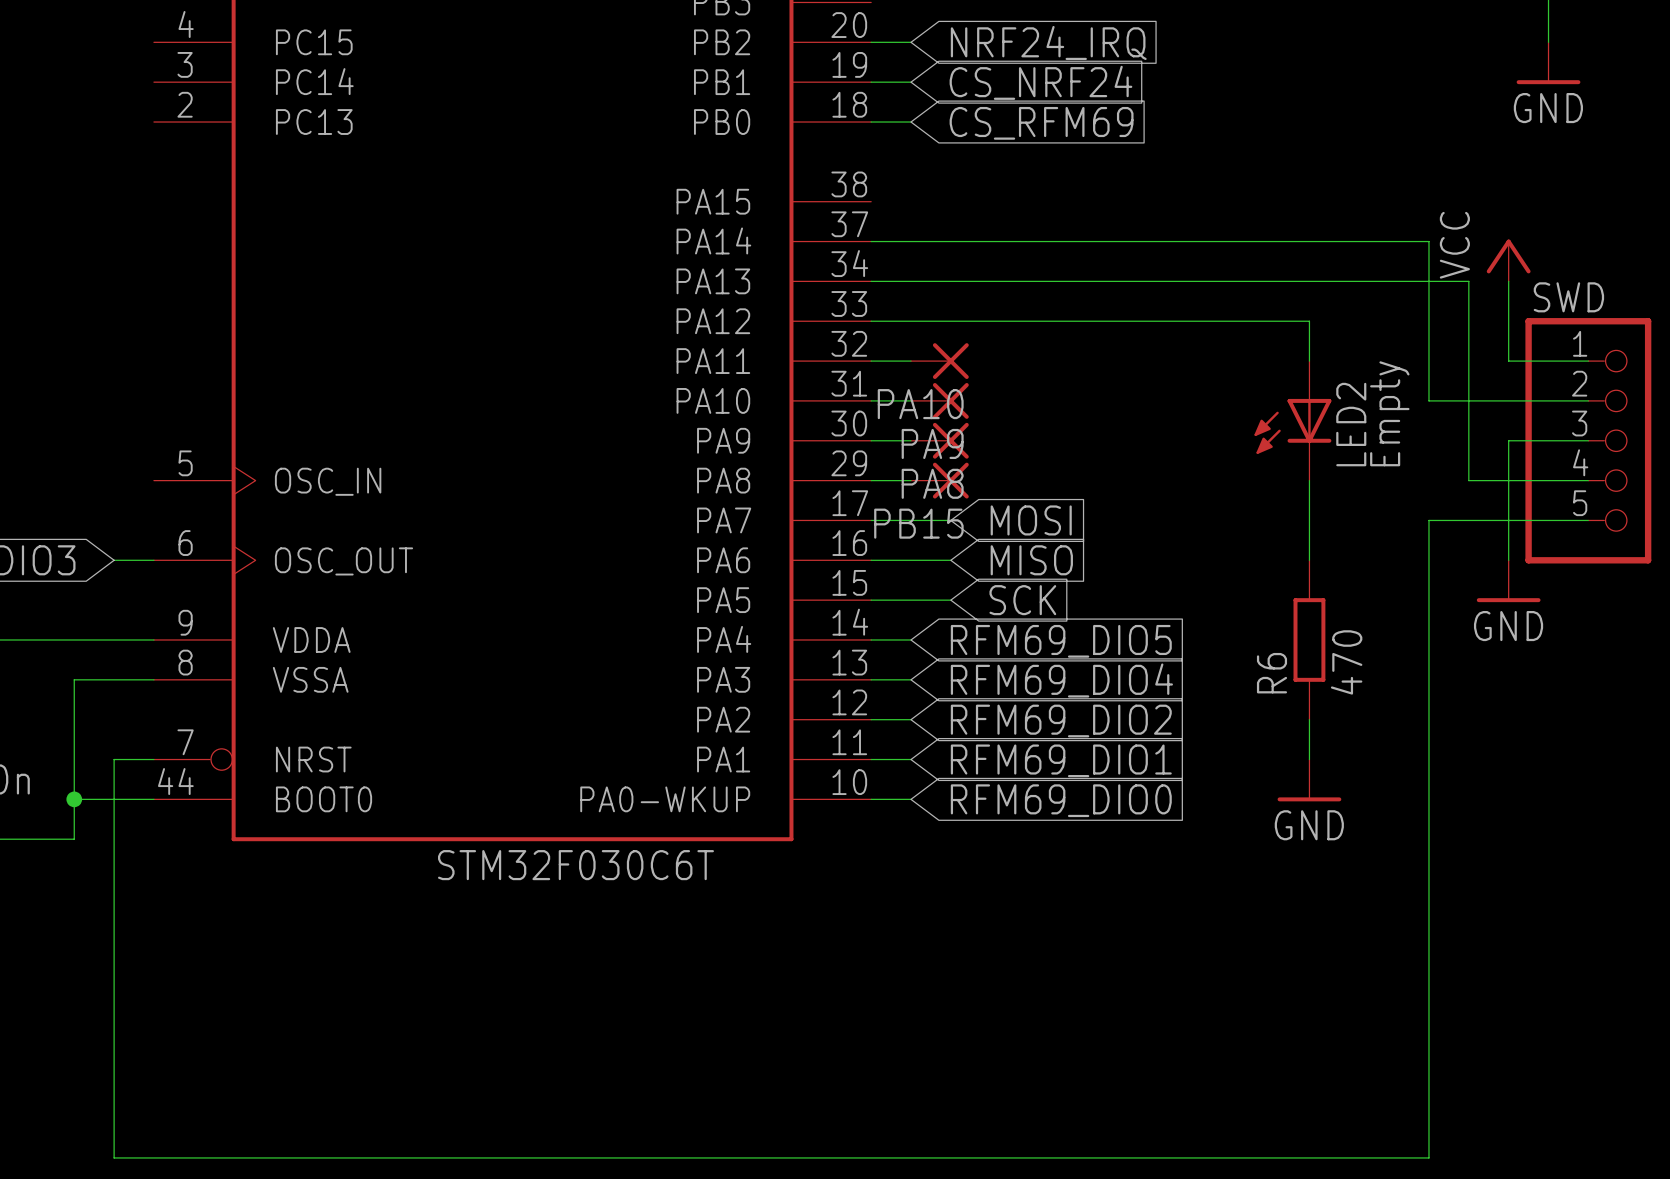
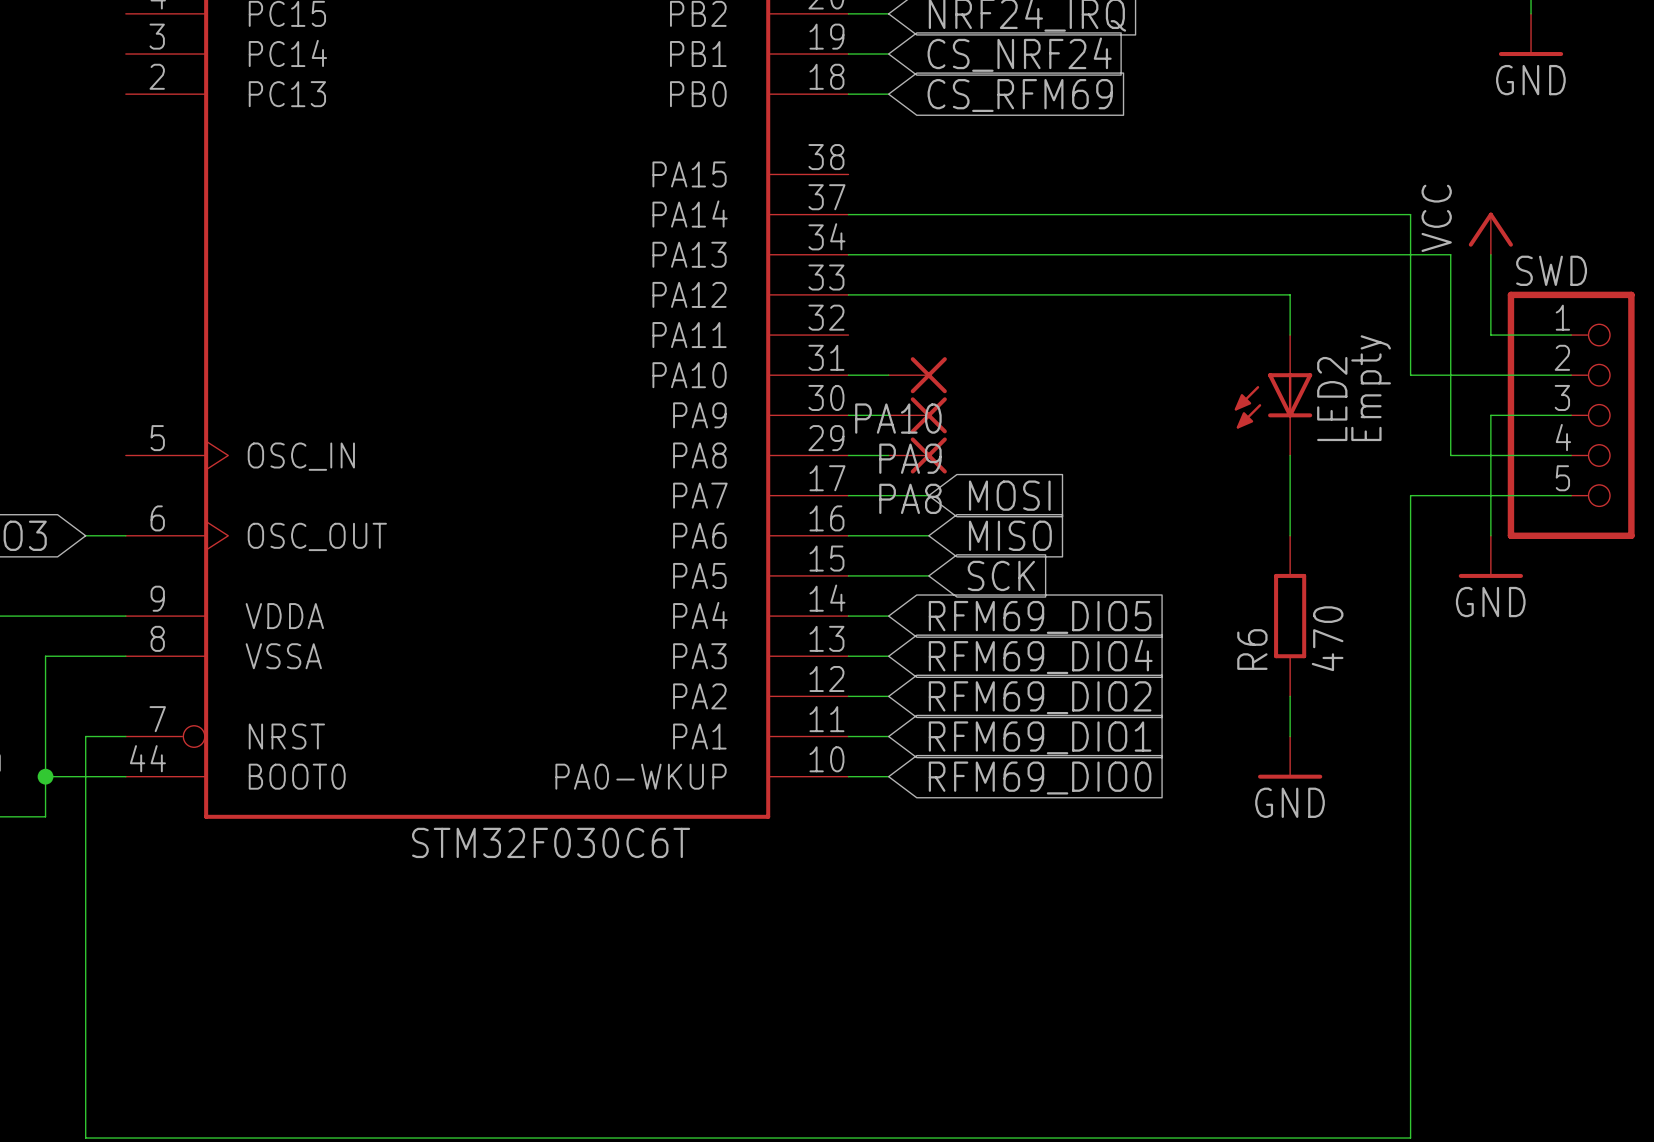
wire: (871, 361) (911, 361) -> none
PA10: (939, 361) -> none
PA9 name: PA9 (932, 443) -> PA10 (898, 418)
PA8 name: PA8 (932, 483) -> PA9 (910, 458)
PB15 name: PB15 (918, 523) -> PA8 (910, 498)

